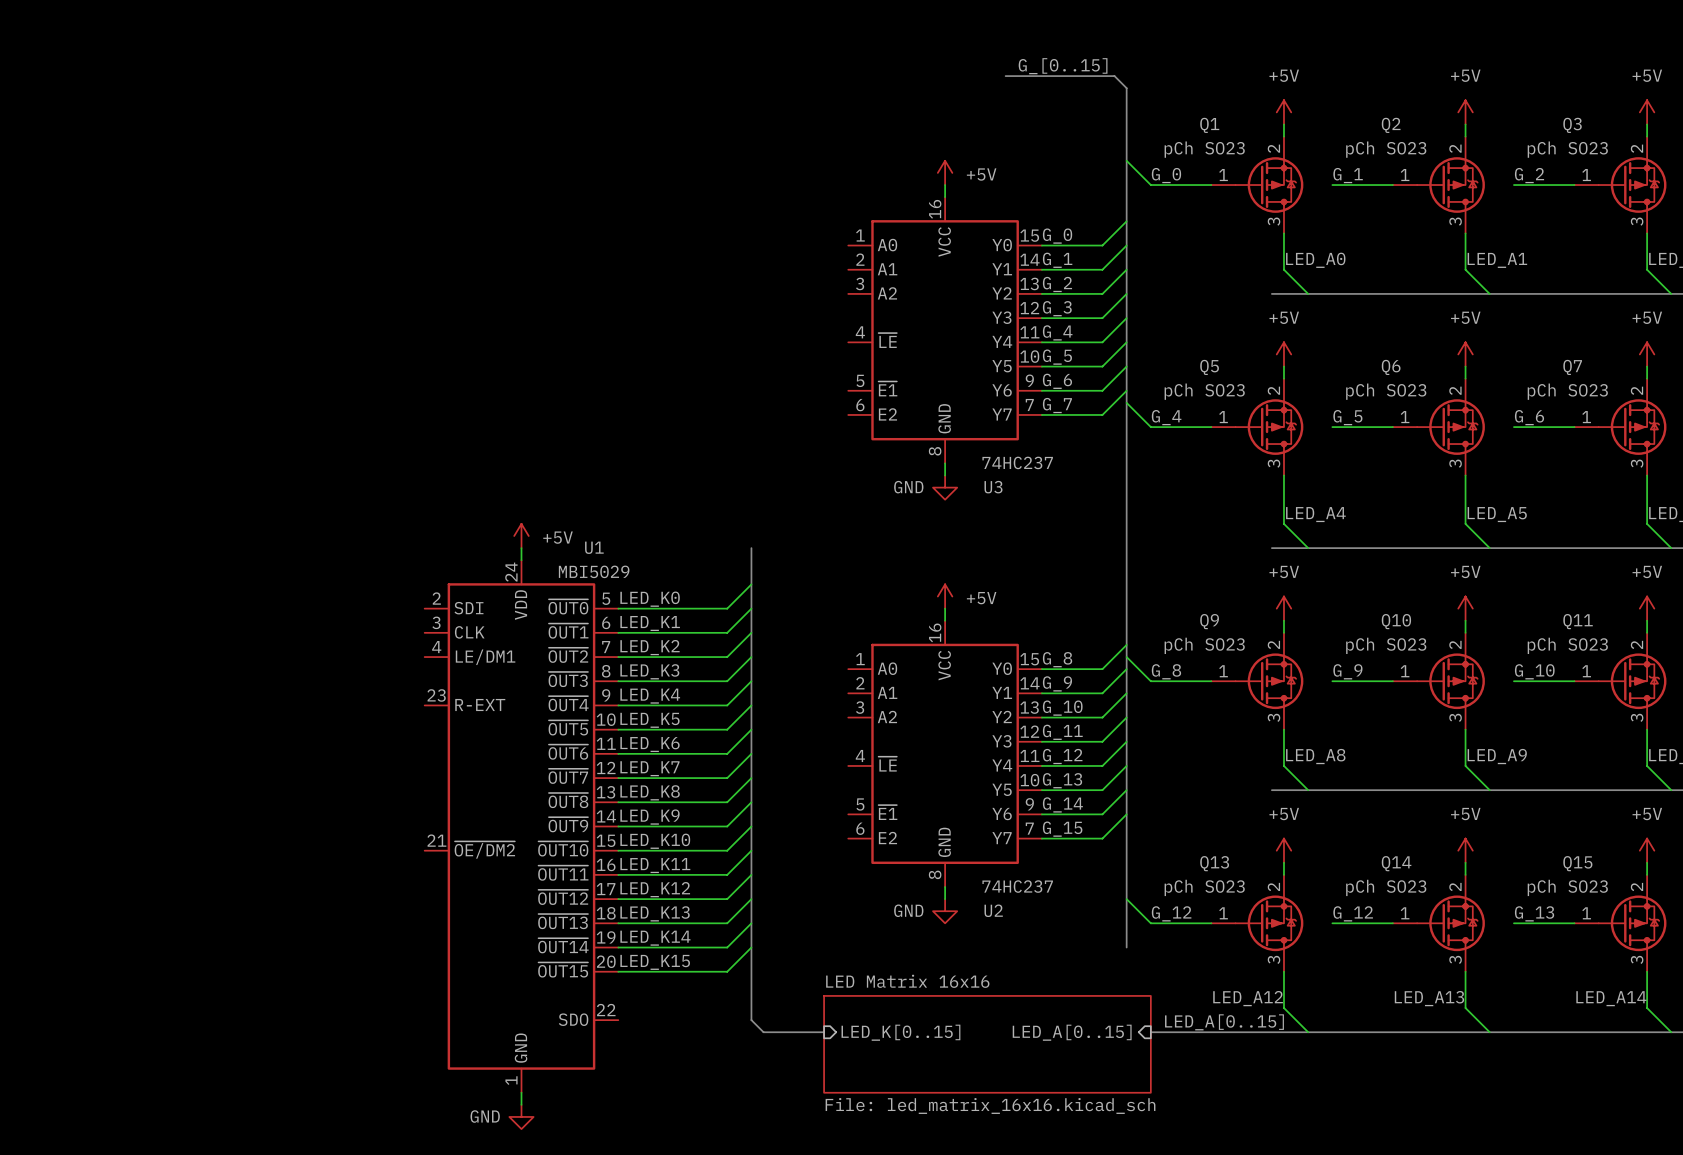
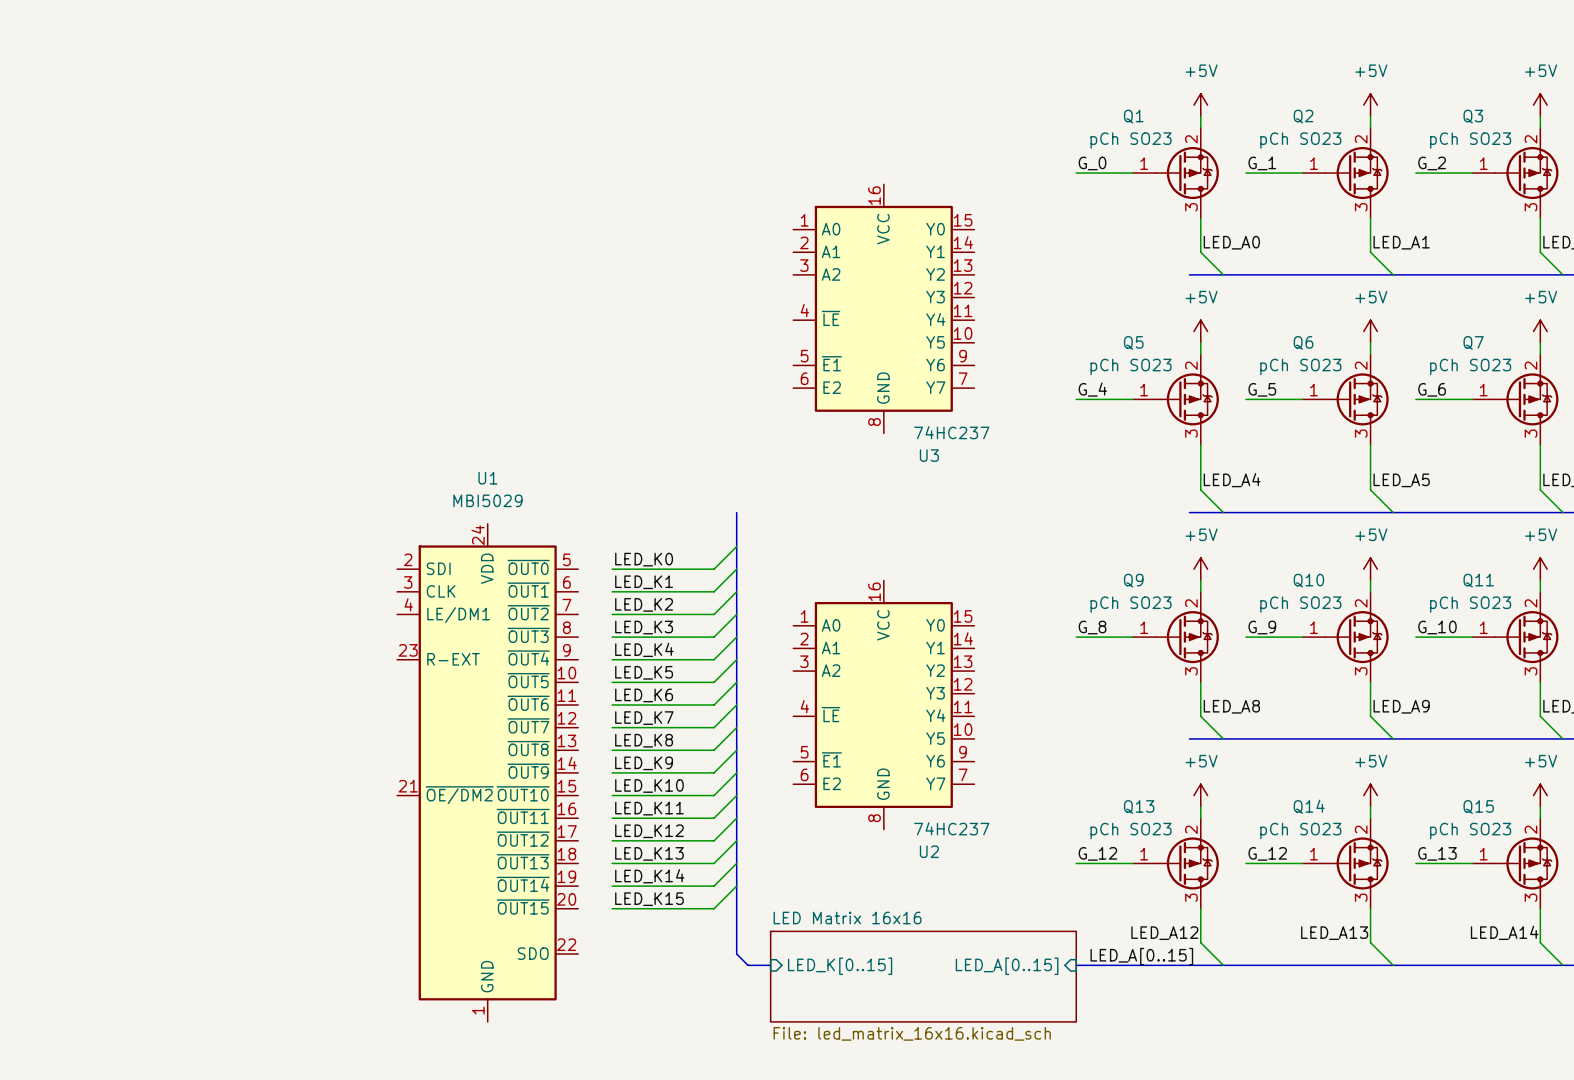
label: G_[0..15] (1063, 66) -> none
bus: (1005, 76) (1114, 76) (1126, 88) (1126, 947) -> none
wire: (1126, 160) (1150, 185) -> none
power symbol: +5V (945, 172) -> none
wire: (945, 185) (945, 197) -> none
wire: (1126, 221) (1102, 245) (1041, 245) -> none
label: G_0 (1057, 236) -> none
wire: (1126, 245) (1102, 269) (1041, 269) -> none
label: G_1 (1057, 260) -> none
wire: (1126, 269) (1102, 293) (1041, 293) -> none
label: G_2 (1057, 284) -> none
wire: (1126, 293) (1102, 318) (1041, 318) -> none
label: G_3 (1057, 308) -> none
wire: (1126, 318) (1102, 342) (1041, 342) -> none
label: G_4 (1057, 332) -> none
wire: (1126, 342) (1102, 366) (1041, 366) -> none
label: G_5 (1057, 357) -> none
wire: (1126, 366) (1102, 390) (1041, 390) -> none
label: G_6 (1057, 381) -> none
wire: (1126, 390) (1102, 414) (1041, 414) -> none
wire: (1126, 402) (1150, 427) -> none
label: G_7 (1057, 405) -> none
wire: (945, 463) (945, 475) -> none
power symbol: GND (945, 487) -> none
power symbol: +5V (521, 536) -> none
U1 name position: U1 (594, 547) -> U1 (487, 478)
wire: (521, 548) (521, 560) -> none
bus: (751, 548) (751, 1020) (763, 1032) (799, 1032) -> (736, 512) (736, 954) (748, 965)
U1 value position: MBI5029 (594, 571) -> MBI5029 (487, 500)
wire: (751, 584) (727, 608) -> (736, 546) (714, 569) (680, 569)
power symbol: +5V (945, 596) -> none
label position: LED_K0 (650, 599) -> LED_K0 (644, 559)
wire: (618, 608) (654, 608) -> none
wire: (751, 608) (727, 632) -> (736, 569) (714, 591) (680, 591)
wire: (945, 608) (945, 620) -> none
label position: LED_K1 (650, 623) -> LED_K1 (644, 582)
wire: (618, 632) (654, 632) -> none
wire: (751, 632) (727, 657) -> (736, 591) (714, 614) (680, 614)
wire: (1126, 644) (1102, 669) (1041, 669) -> none
label position: LED_K2 (650, 647) -> LED_K2 (644, 604)
wire: (618, 657) (654, 657) -> none
wire: (751, 657) (727, 681) -> (736, 614) (714, 637) (680, 637)
wire: (1126, 657) (1150, 681) -> none
label: G_8 (1057, 659) -> none
wire: (1126, 669) (1102, 693) (1041, 693) -> none
label position: LED_K3 (649, 671) -> LED_K3 (644, 627)
wire: (618, 681) (654, 681) -> none
wire: (751, 681) (727, 705) -> (736, 637) (714, 659) (680, 659)
label: G_9 (1057, 683) -> none
wire: (1126, 693) (1102, 717) (1041, 717) -> none
label position: LED_K4 (650, 696) -> LED_K4 (644, 649)
wire: (618, 705) (654, 705) -> none
wire: (751, 705) (727, 729) -> (736, 659) (714, 682) (680, 682)
label: G_10 (1062, 708) -> none
wire: (1126, 717) (1102, 741) (1041, 741) -> none
label position: LED_K5 (649, 720) -> LED_K5 (644, 672)
wire: (618, 729) (654, 729) -> none
wire: (751, 729) (727, 753) -> (736, 682) (714, 705) (680, 705)
label: G_11 (1062, 732) -> none
wire: (1126, 741) (1102, 765) (1041, 765) -> none
label position: LED_K6 (650, 744) -> LED_K6 (644, 695)
wire: (618, 753) (654, 753) -> none
wire: (751, 753) (727, 778) -> (736, 705) (714, 727) (680, 727)
label: G_12 (1062, 756) -> none
wire: (1126, 765) (1102, 790) (1041, 790) -> none
label position: LED_K7 (649, 768) -> LED_K7 (644, 718)
wire: (618, 778) (654, 778) -> none
wire: (751, 778) (727, 802) -> (736, 727) (714, 750) (680, 750)
label: G_13 (1062, 780) -> none
wire: (1126, 790) (1102, 814) (1041, 814) -> none
label position: LED_K8 (650, 792) -> LED_K8 (644, 740)
wire: (618, 802) (654, 802) -> none
wire: (751, 802) (727, 826) -> (736, 750) (714, 772) (680, 772)
label: G_14 (1062, 804) -> none
wire: (1126, 814) (1102, 838) (1041, 838) -> none
label position: LED_K9 (650, 817) -> LED_K9 (644, 763)
wire: (618, 826) (654, 826) -> none
wire: (751, 826) (727, 850) -> (736, 772) (714, 795) (680, 795)
label: G_15 (1062, 829) -> none
label position: LED_K10 (655, 841) -> LED_K10 (649, 785)
wire: (618, 850) (654, 850) -> none
wire: (751, 850) (727, 874) -> (736, 795) (714, 818) (680, 818)
label position: LED_K11 (655, 865) -> LED_K11 (649, 808)
wire: (618, 874) (654, 874) -> none
wire: (751, 874) (727, 899) -> (736, 818) (714, 840) (680, 840)
wire: (945, 887) (945, 899) -> none
label position: LED_K12 (655, 889) -> LED_K12 (649, 831)
wire: (618, 899) (654, 899) -> none
wire: (751, 899) (727, 923) -> (736, 840) (714, 863) (680, 863)
wire: (1126, 899) (1150, 923) -> none
power symbol: GND (945, 911) -> none
label position: LED_K13 (655, 913) -> LED_K13 (649, 853)
wire: (618, 923) (654, 923) -> none
wire: (751, 923) (727, 947) -> (736, 863) (714, 886) (680, 886)
label position: LED_K14 (655, 938) -> LED_K14 (649, 876)
wire: (618, 947) (654, 947) -> none
wire: (751, 947) (727, 971) -> (736, 886) (714, 908) (680, 908)
label position: LED_K15 (655, 962) -> LED_K15 (649, 899)
wire: (618, 971) (654, 971) -> none
wire: (521, 1092) (521, 1104) -> none
power symbol: GND (521, 1116) -> none

